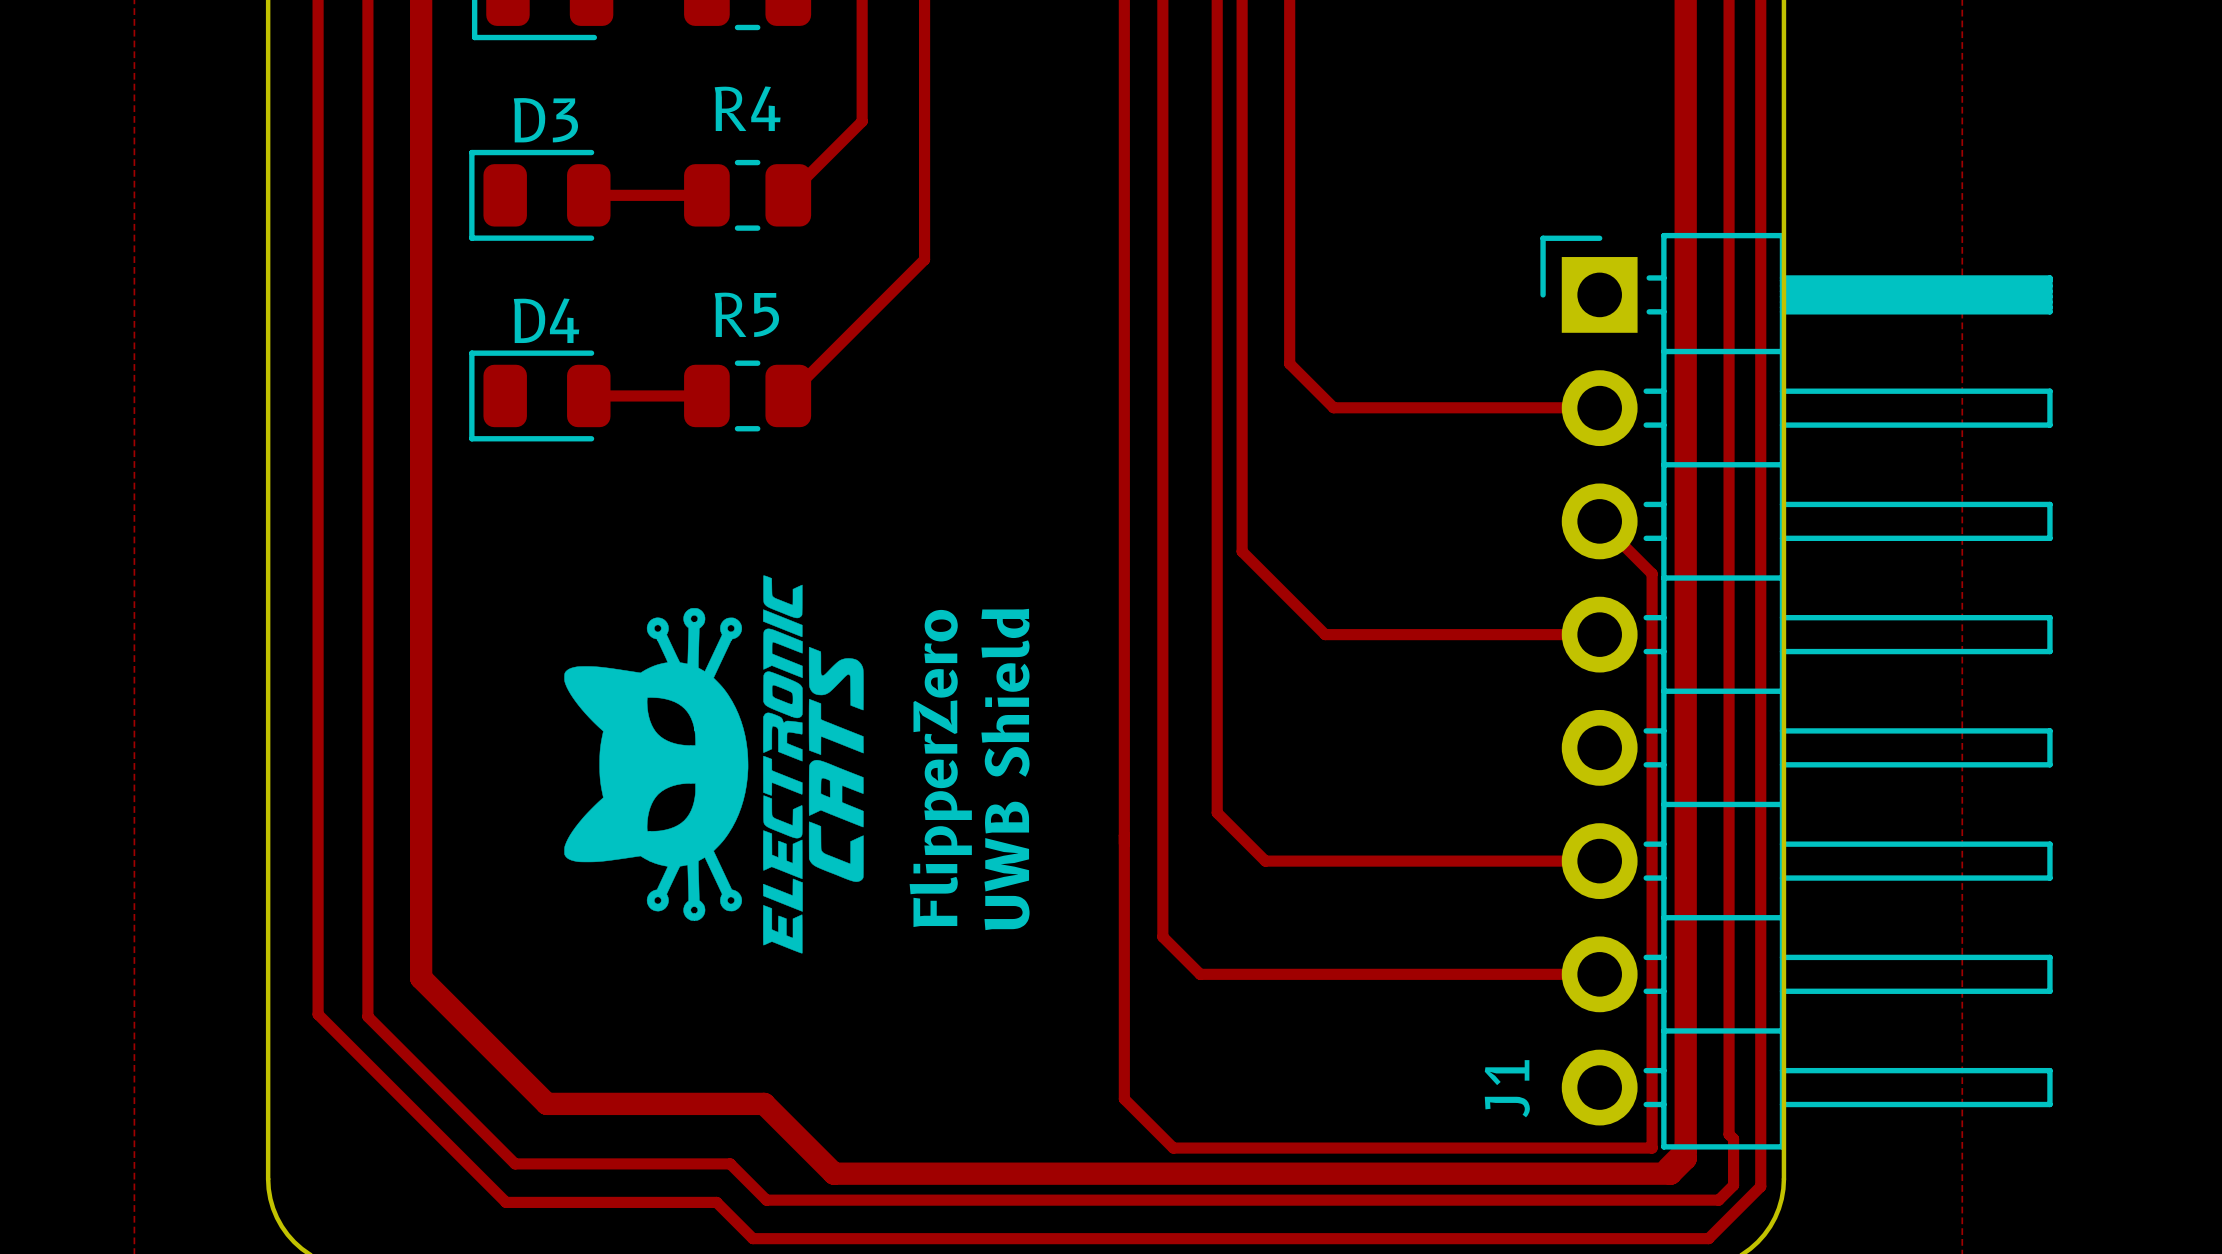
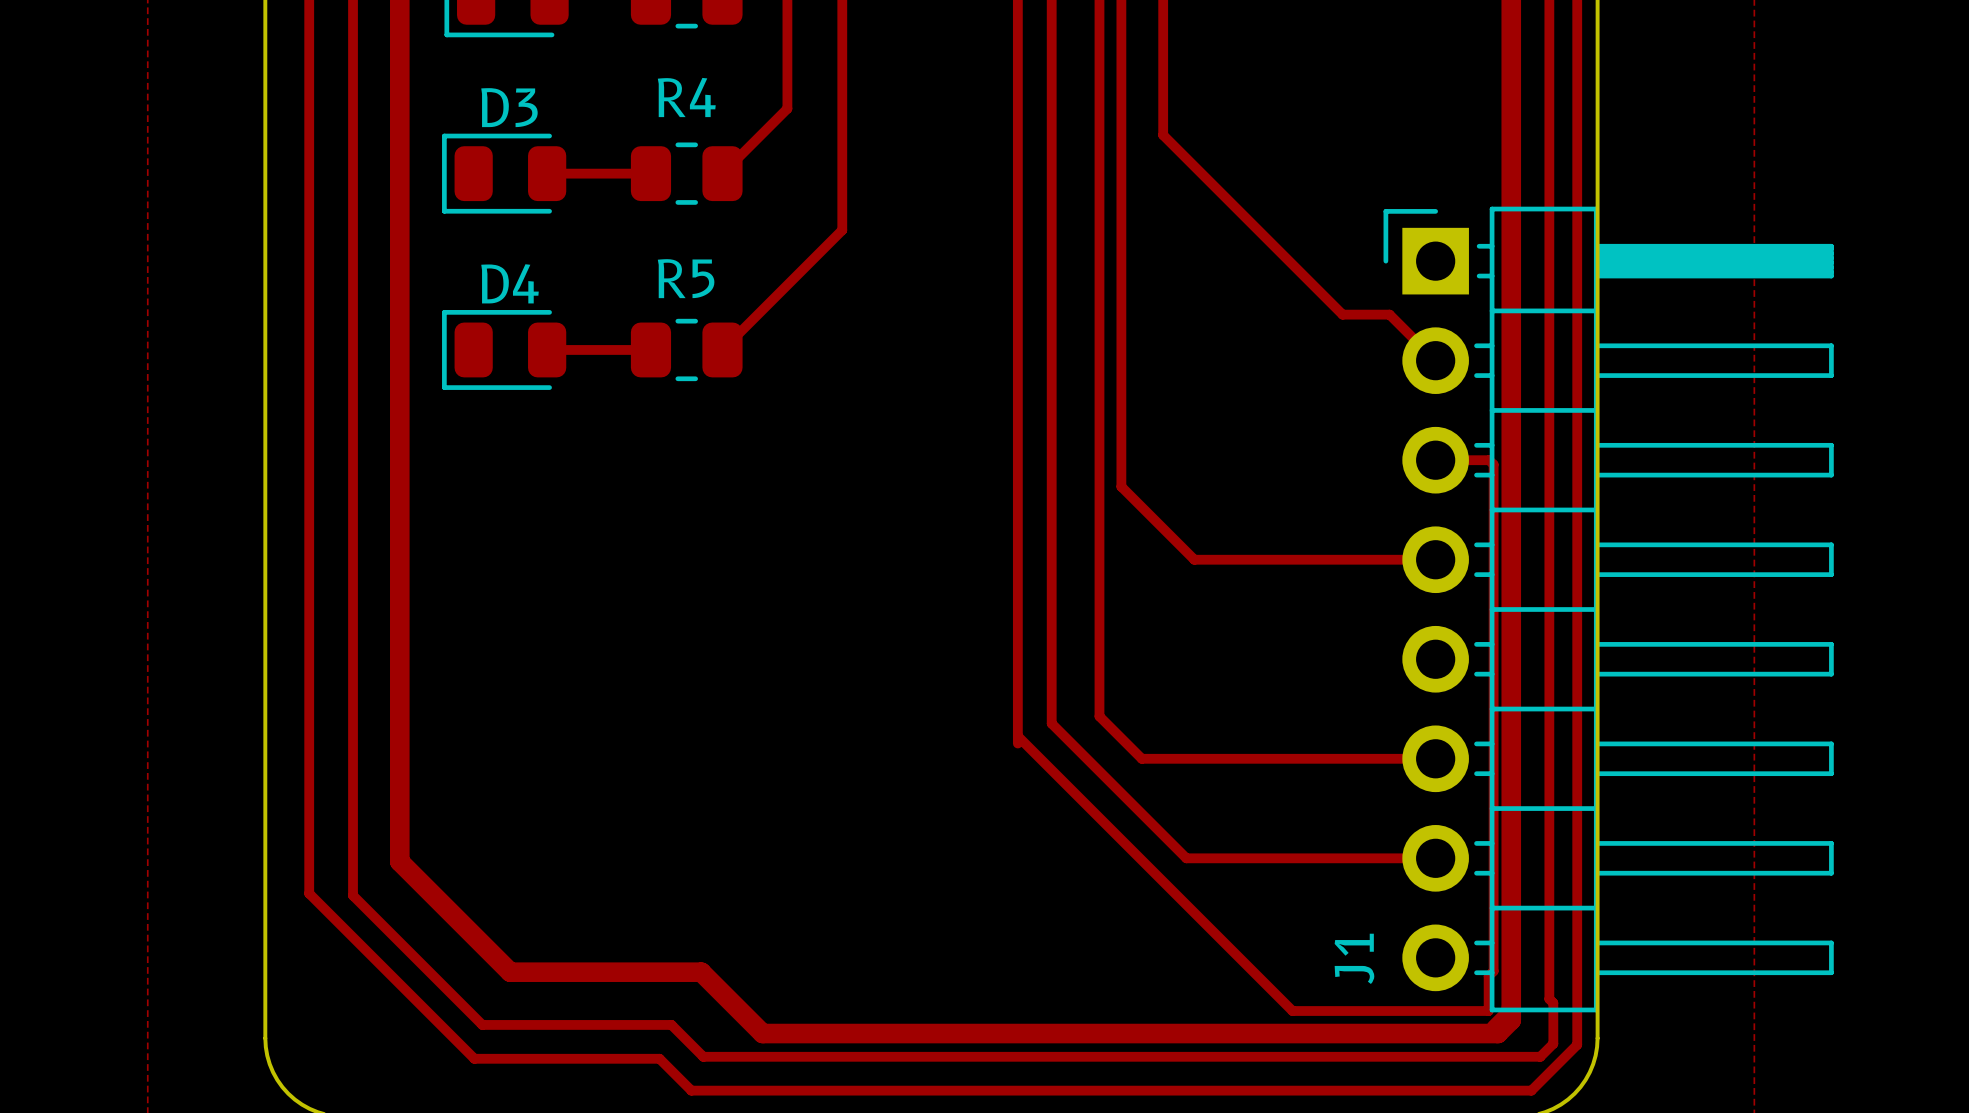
track: (1289, 151) (1289, 363) (1333, 407) (1599, 407) -> (1163, 135) (1342, 314) (1389, 314) (1435, 360)
track: (1599, 521) (1652, 573) (1652, 1148) -> (1435, 460) (1489, 460) (1493, 464) (1493, 971) (1488, 976) (1488, 1011) (1481, 1011)
drawing: [564, 575, 864, 954] -> none
text: FlipperZero (940, 768) -> none
text: UWB Shield (1005, 769) -> none
track: (1162, 821) (1162, 936) (1200, 974) (1316, 974) -> (1051, 723) (1186, 858)
track: (1124, 843) (1124, 1099) (1173, 1148) (1436, 1148) -> (1017, 736) (1292, 1011)

